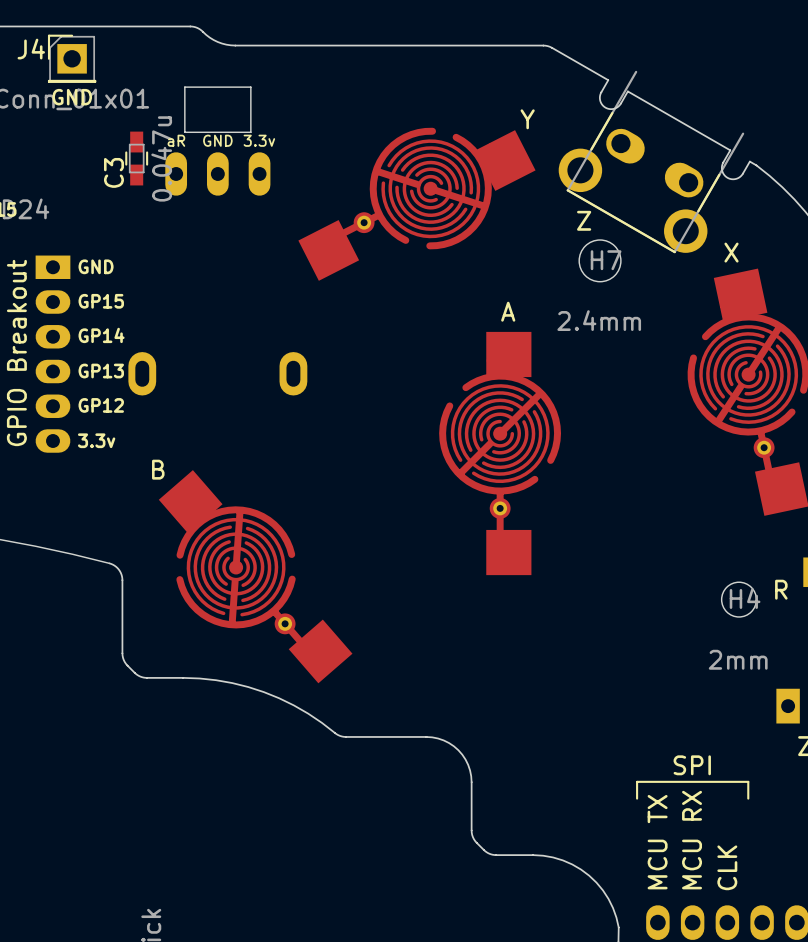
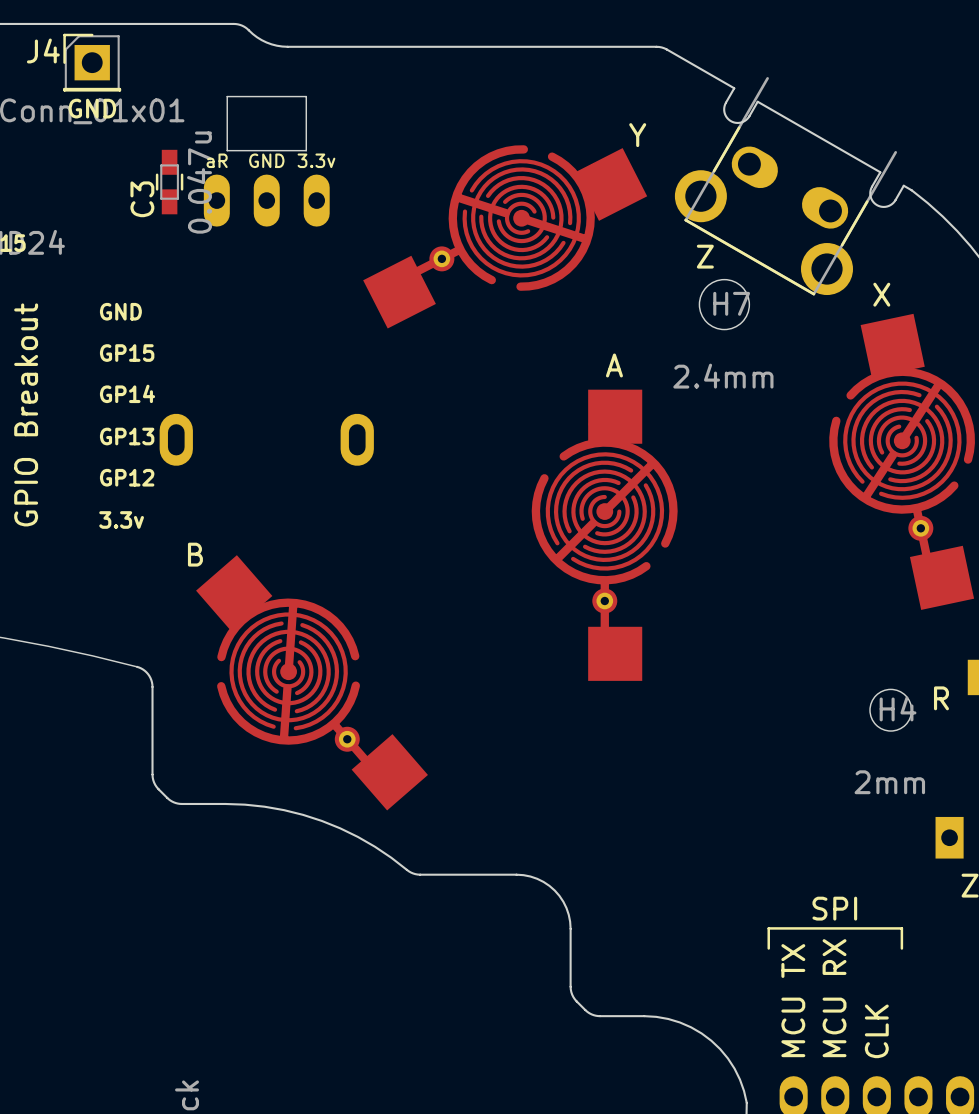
part: (52, 354) -> none

